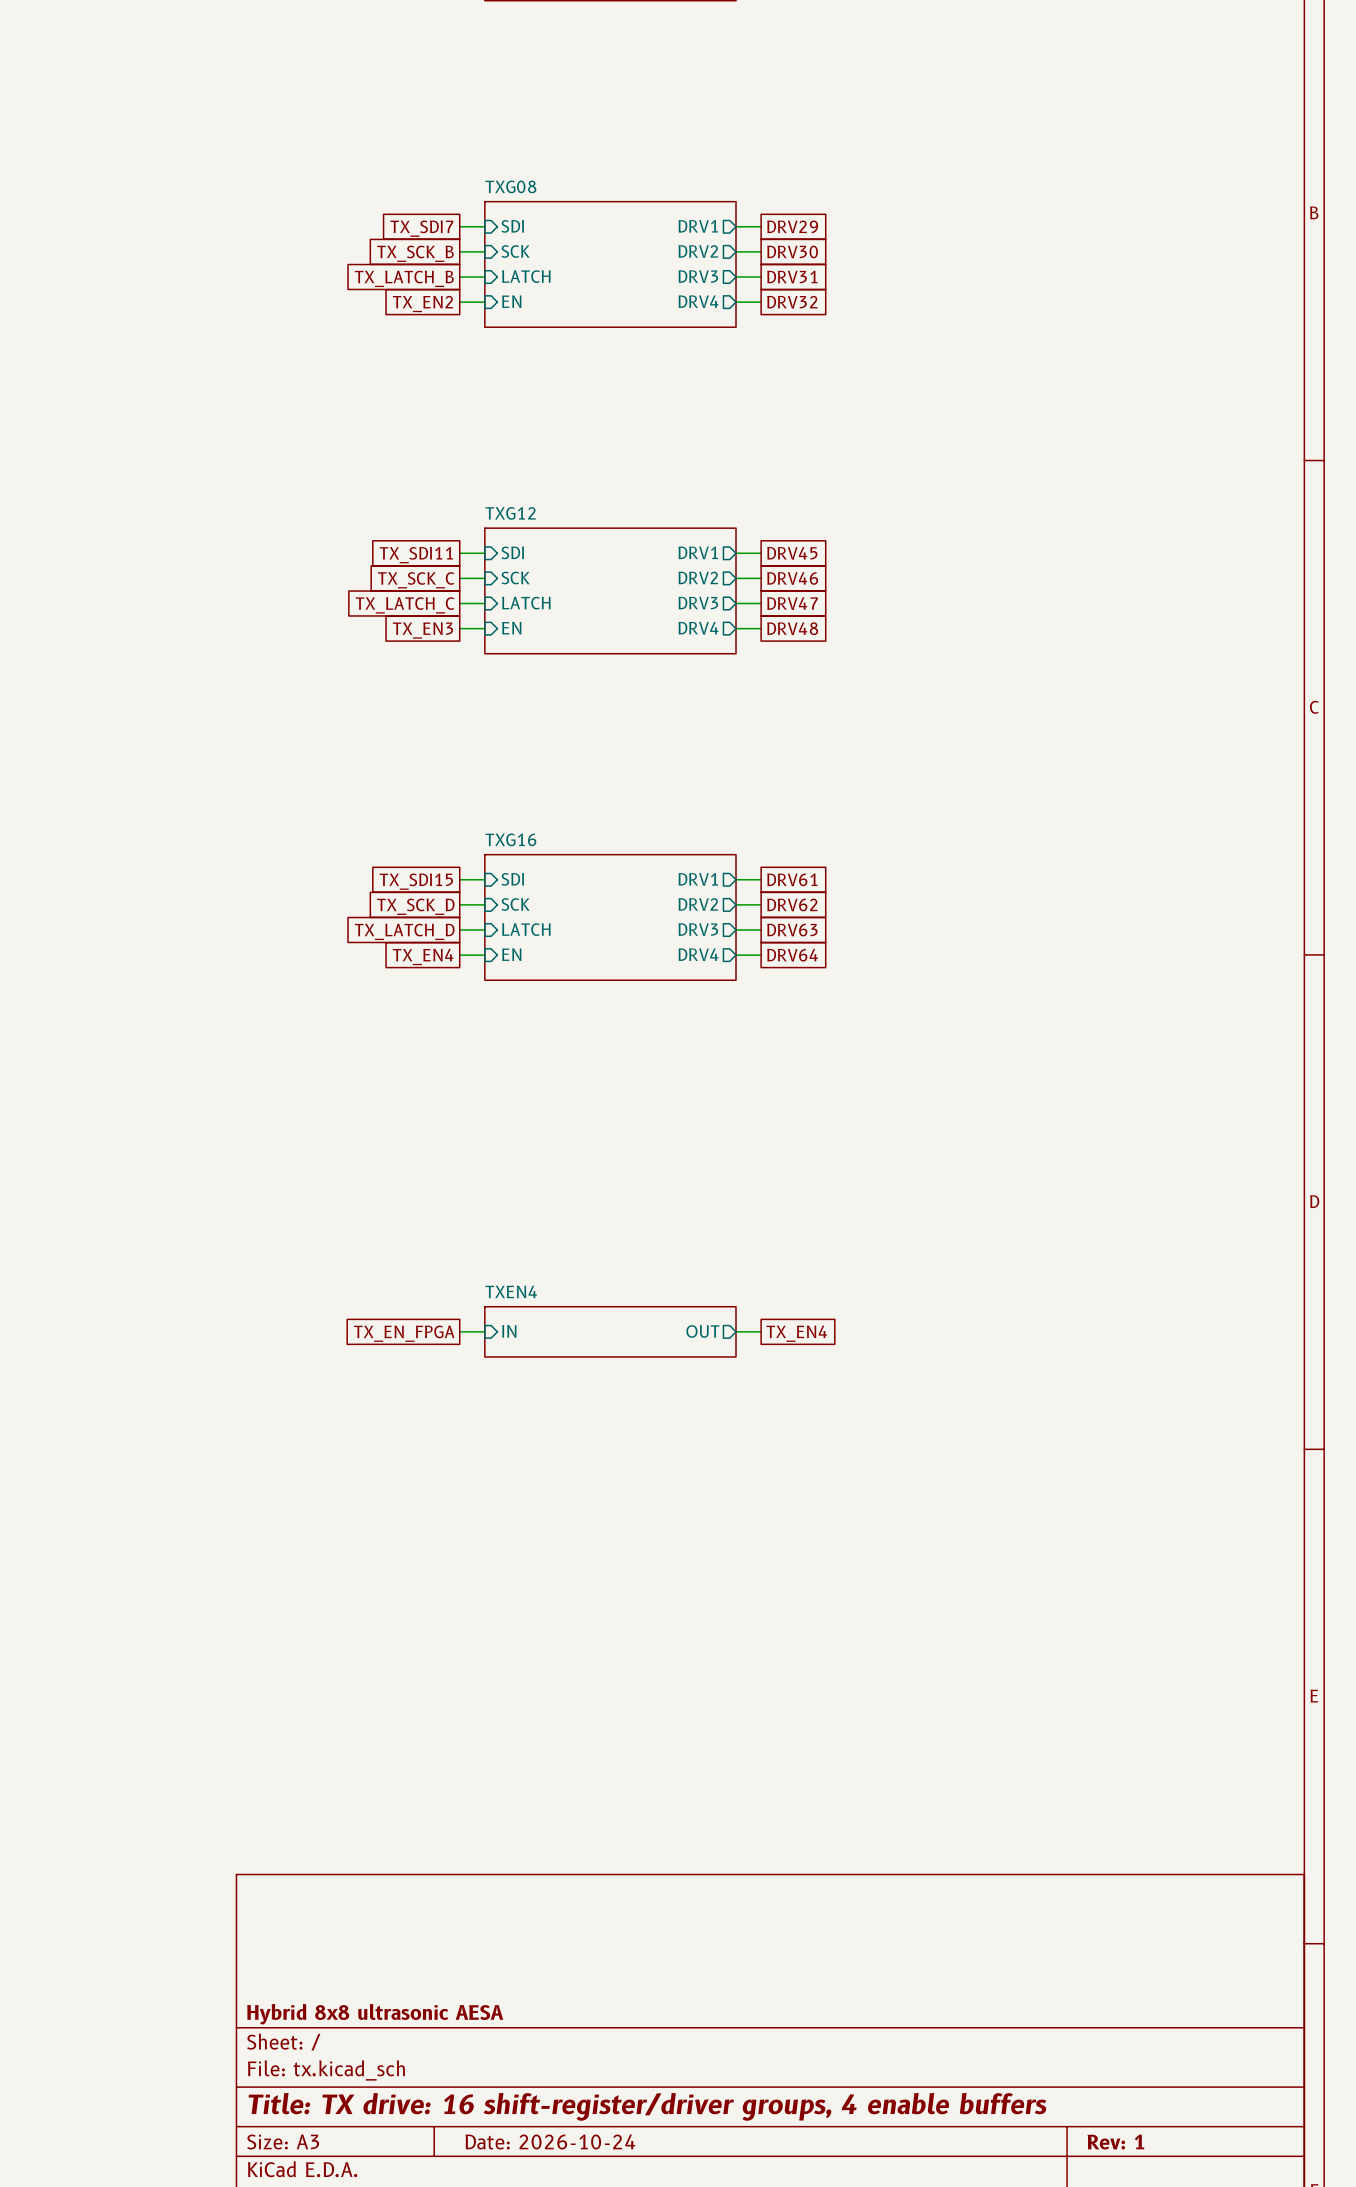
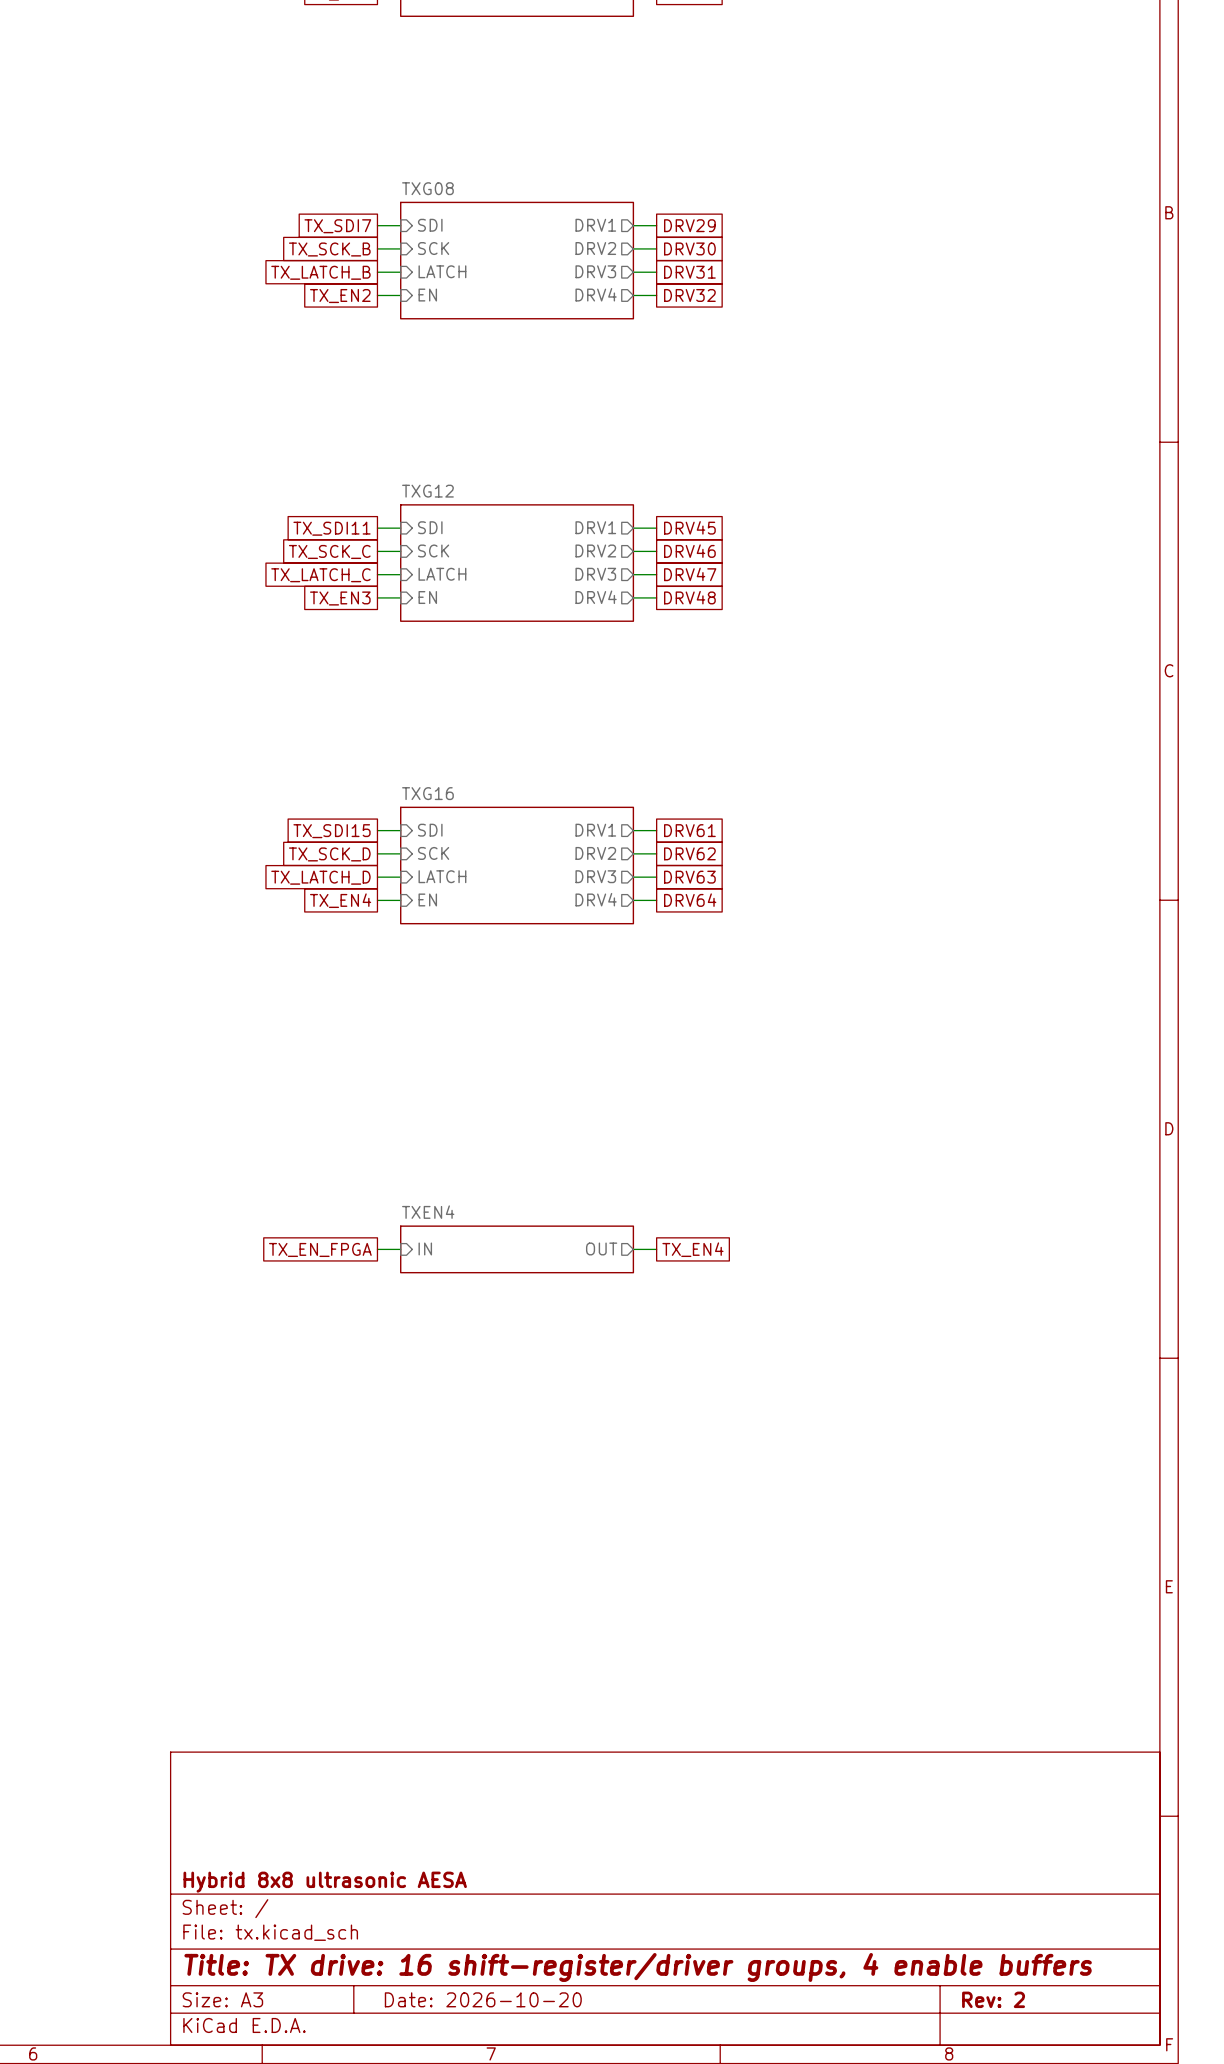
title block: Date: 2026-10-24 (550, 2142) -> Date: 2026-10-20 (483, 1999)
title block: Rev: 1 (1115, 2142) -> Rev: 2 (993, 1999)

